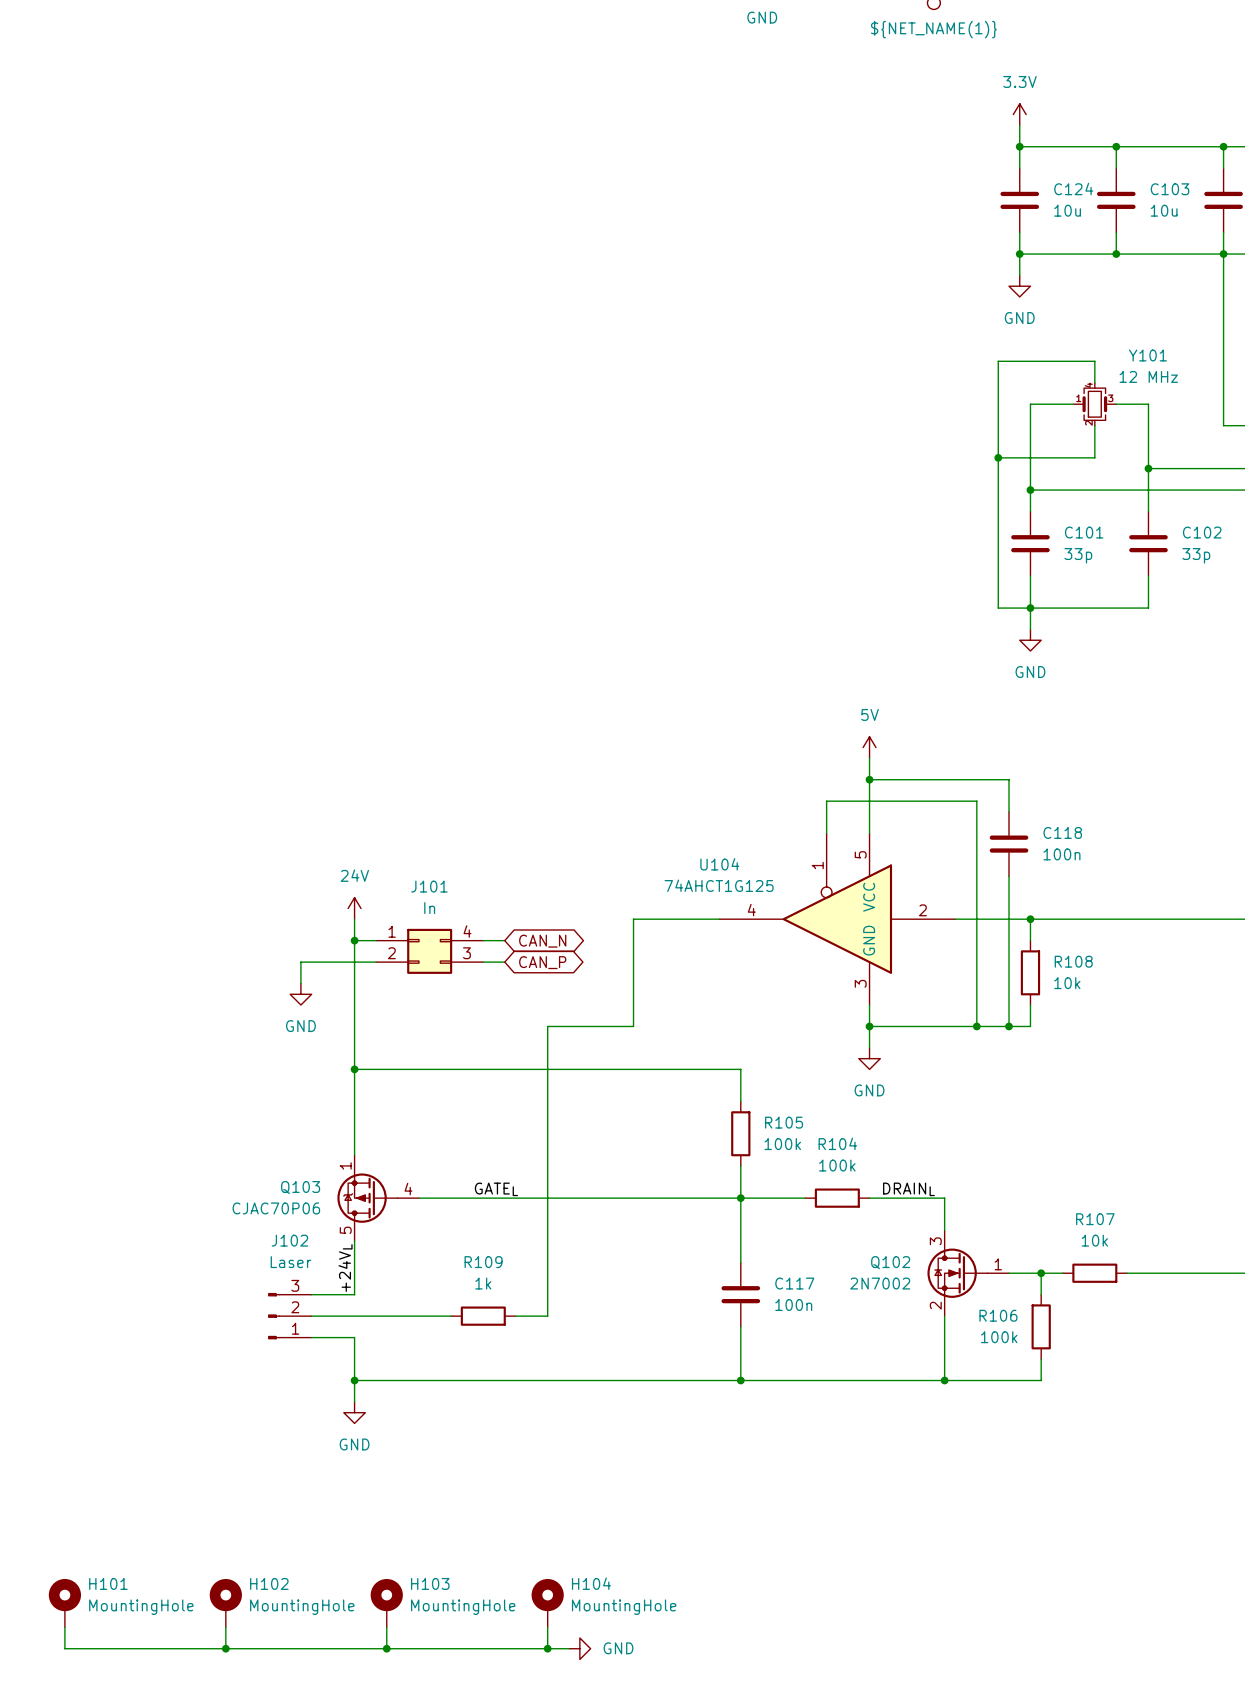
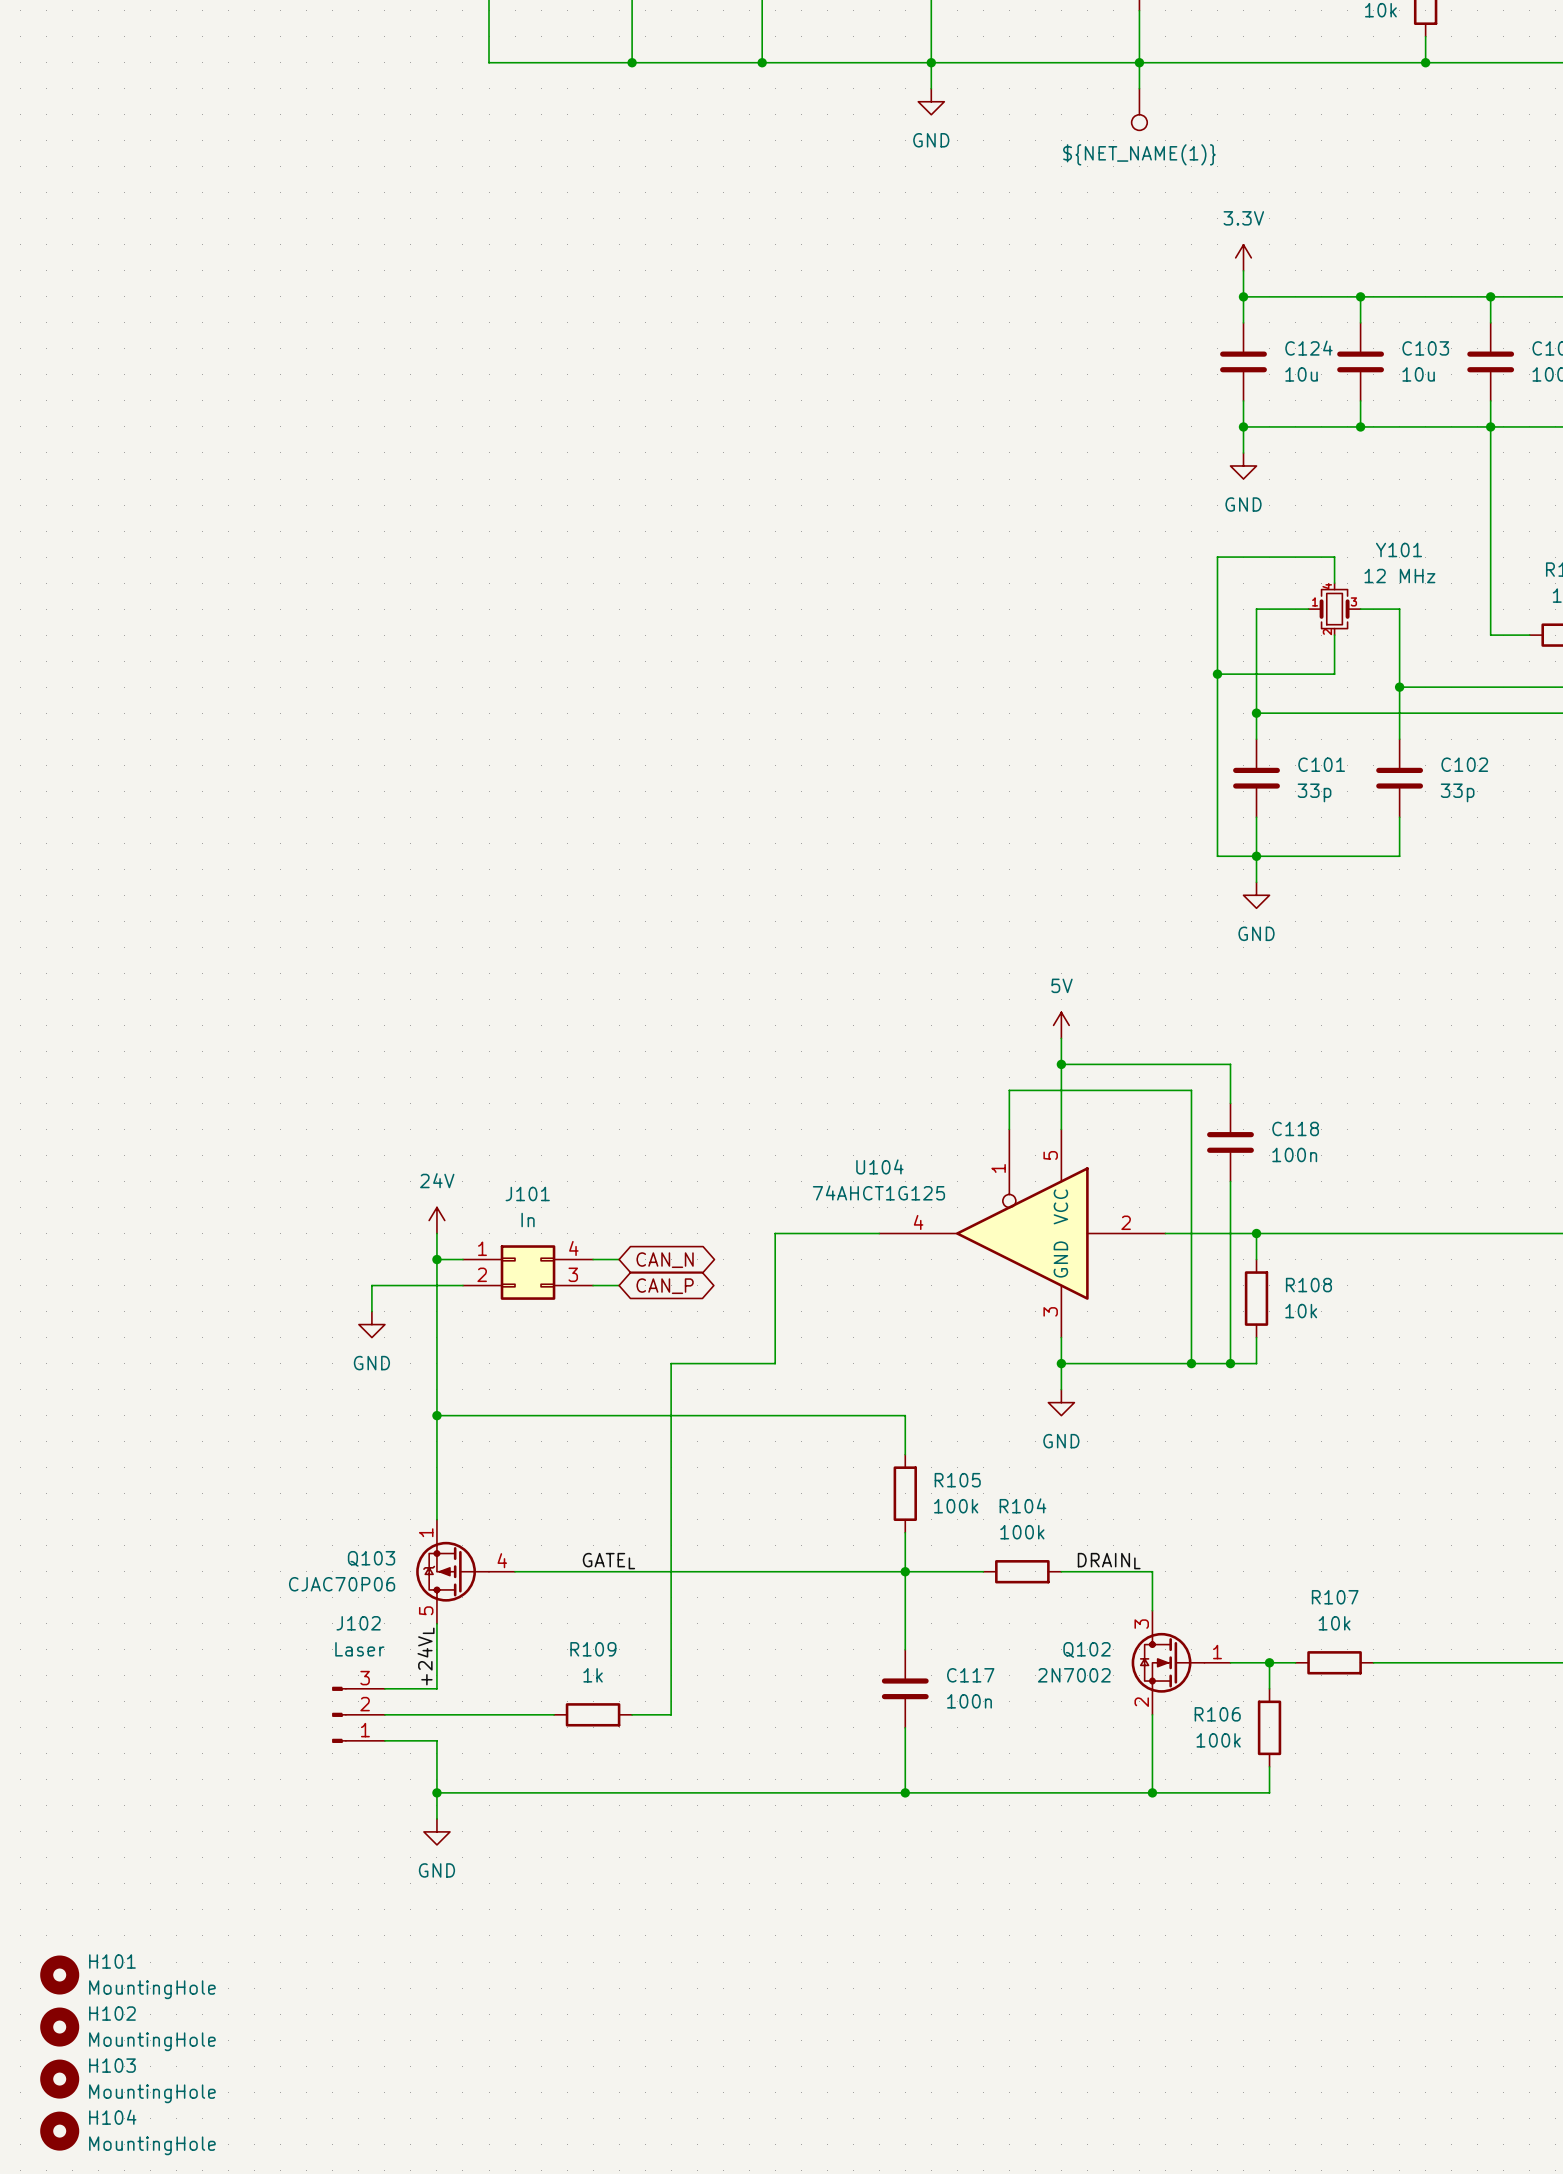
H101 symbol: [48, 1578, 81, 1628] -> [40, 1955, 80, 1995]
H102 symbol: [209, 1578, 242, 1628] -> [40, 2007, 80, 2047]
H103 symbol: [370, 1578, 403, 1628] -> [40, 2059, 80, 2099]
H104 symbol: [531, 1578, 564, 1628] -> [40, 2111, 80, 2151]
wire: (64, 1627) (64, 1648) (569, 1648) -> none
wire: (225, 1627) (225, 1648) -> none
wire: (386, 1627) (386, 1648) -> none
wire: (547, 1627) (547, 1648) -> none
junction: (225, 1648) -> none
junction: (386, 1648) -> none
junction: (547, 1648) -> none
power symbol: GND (579, 1648) -> none

